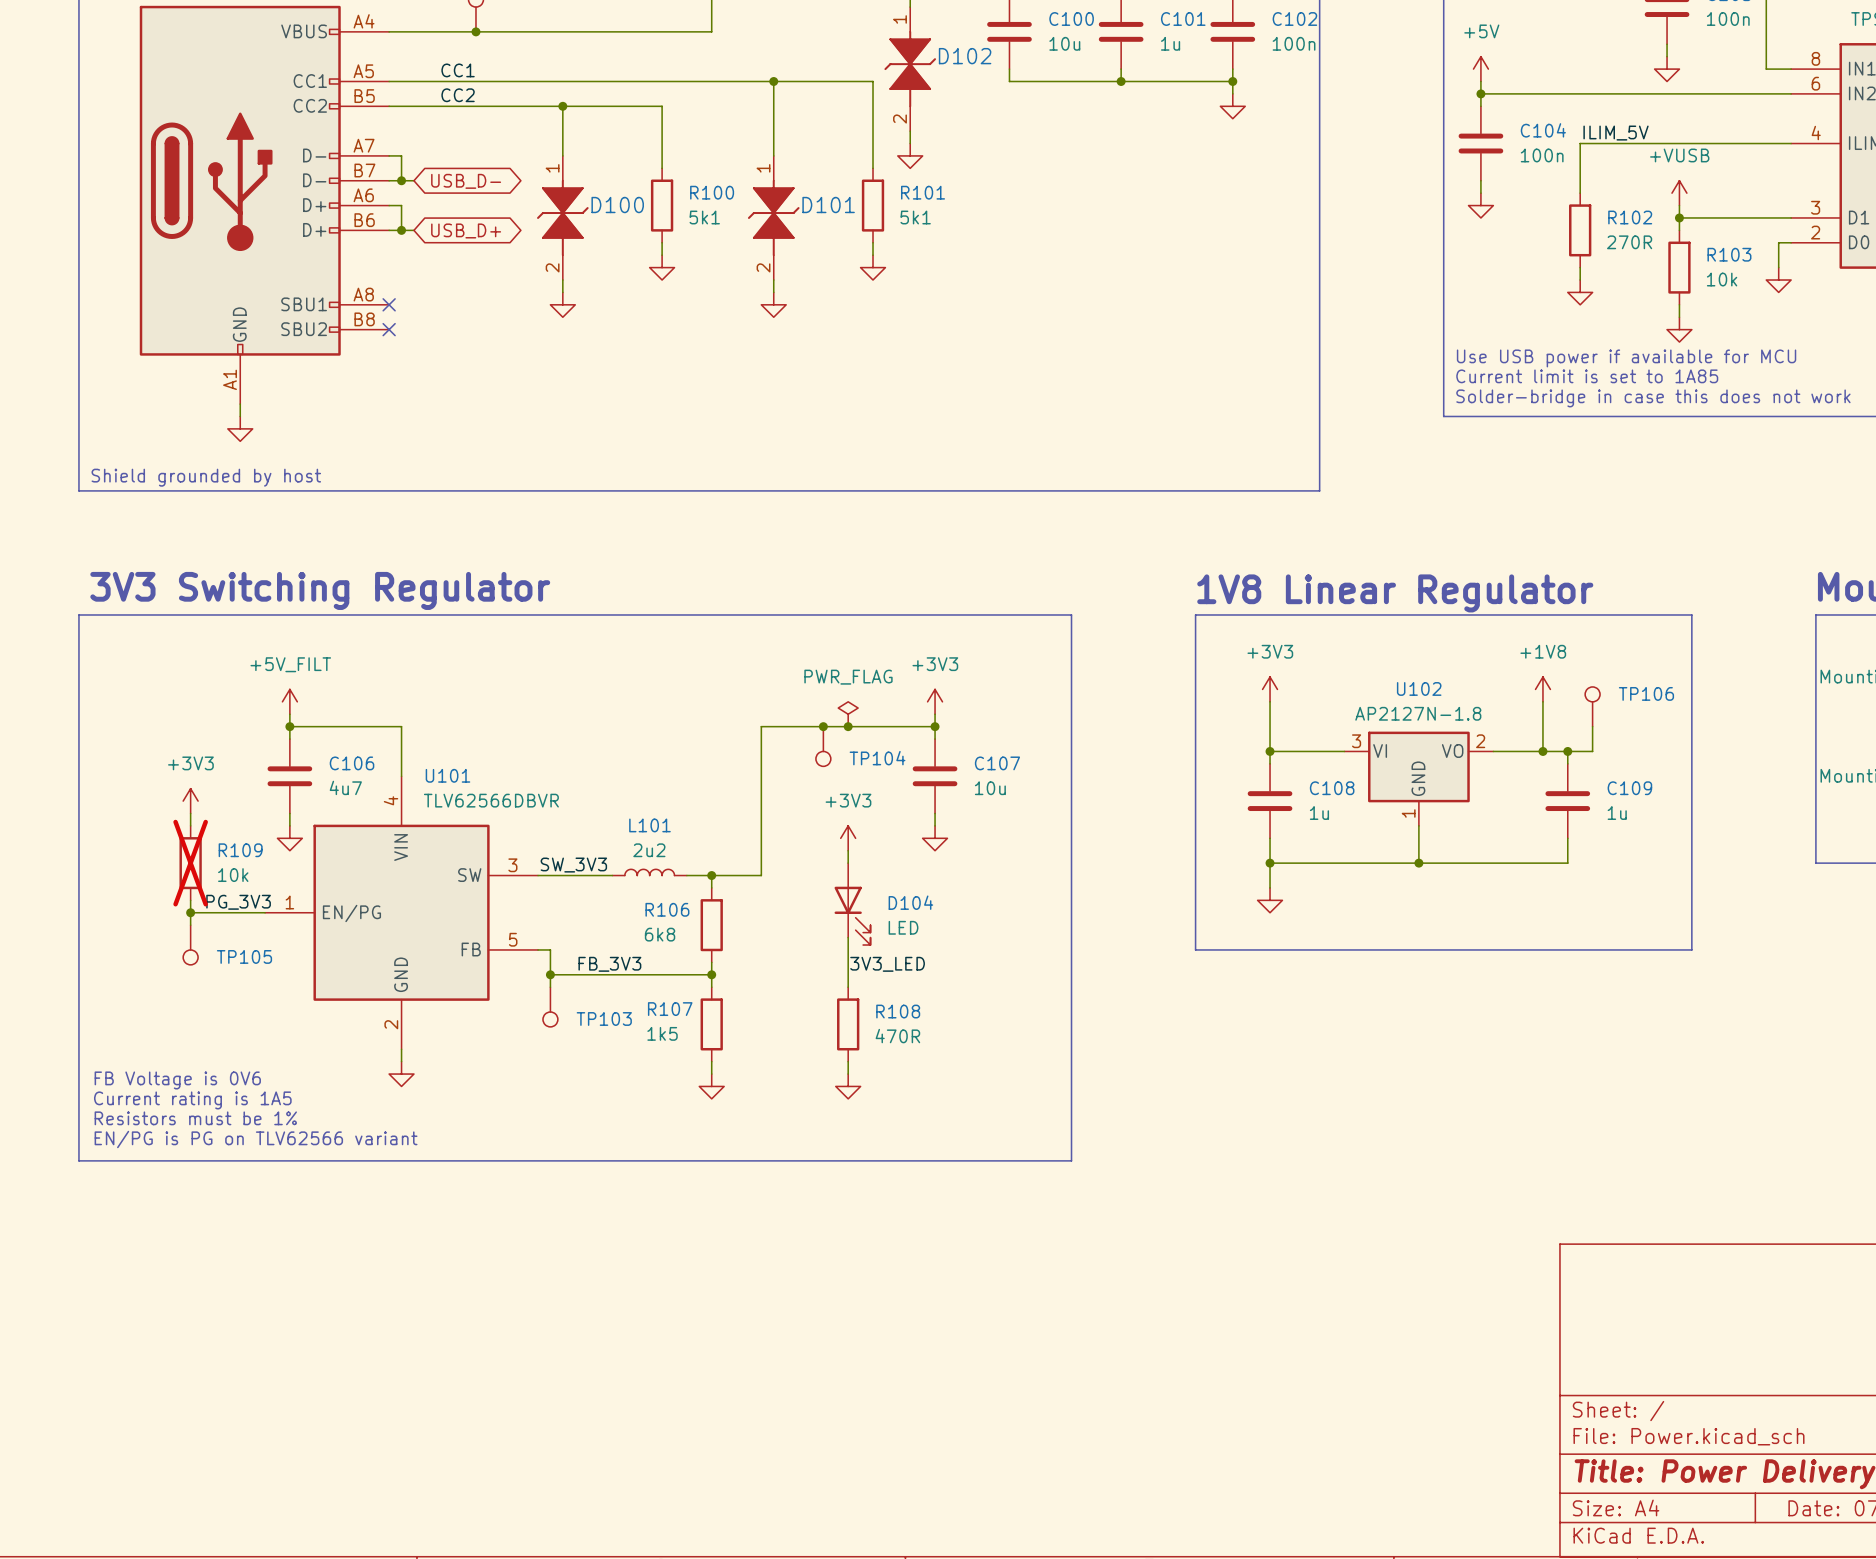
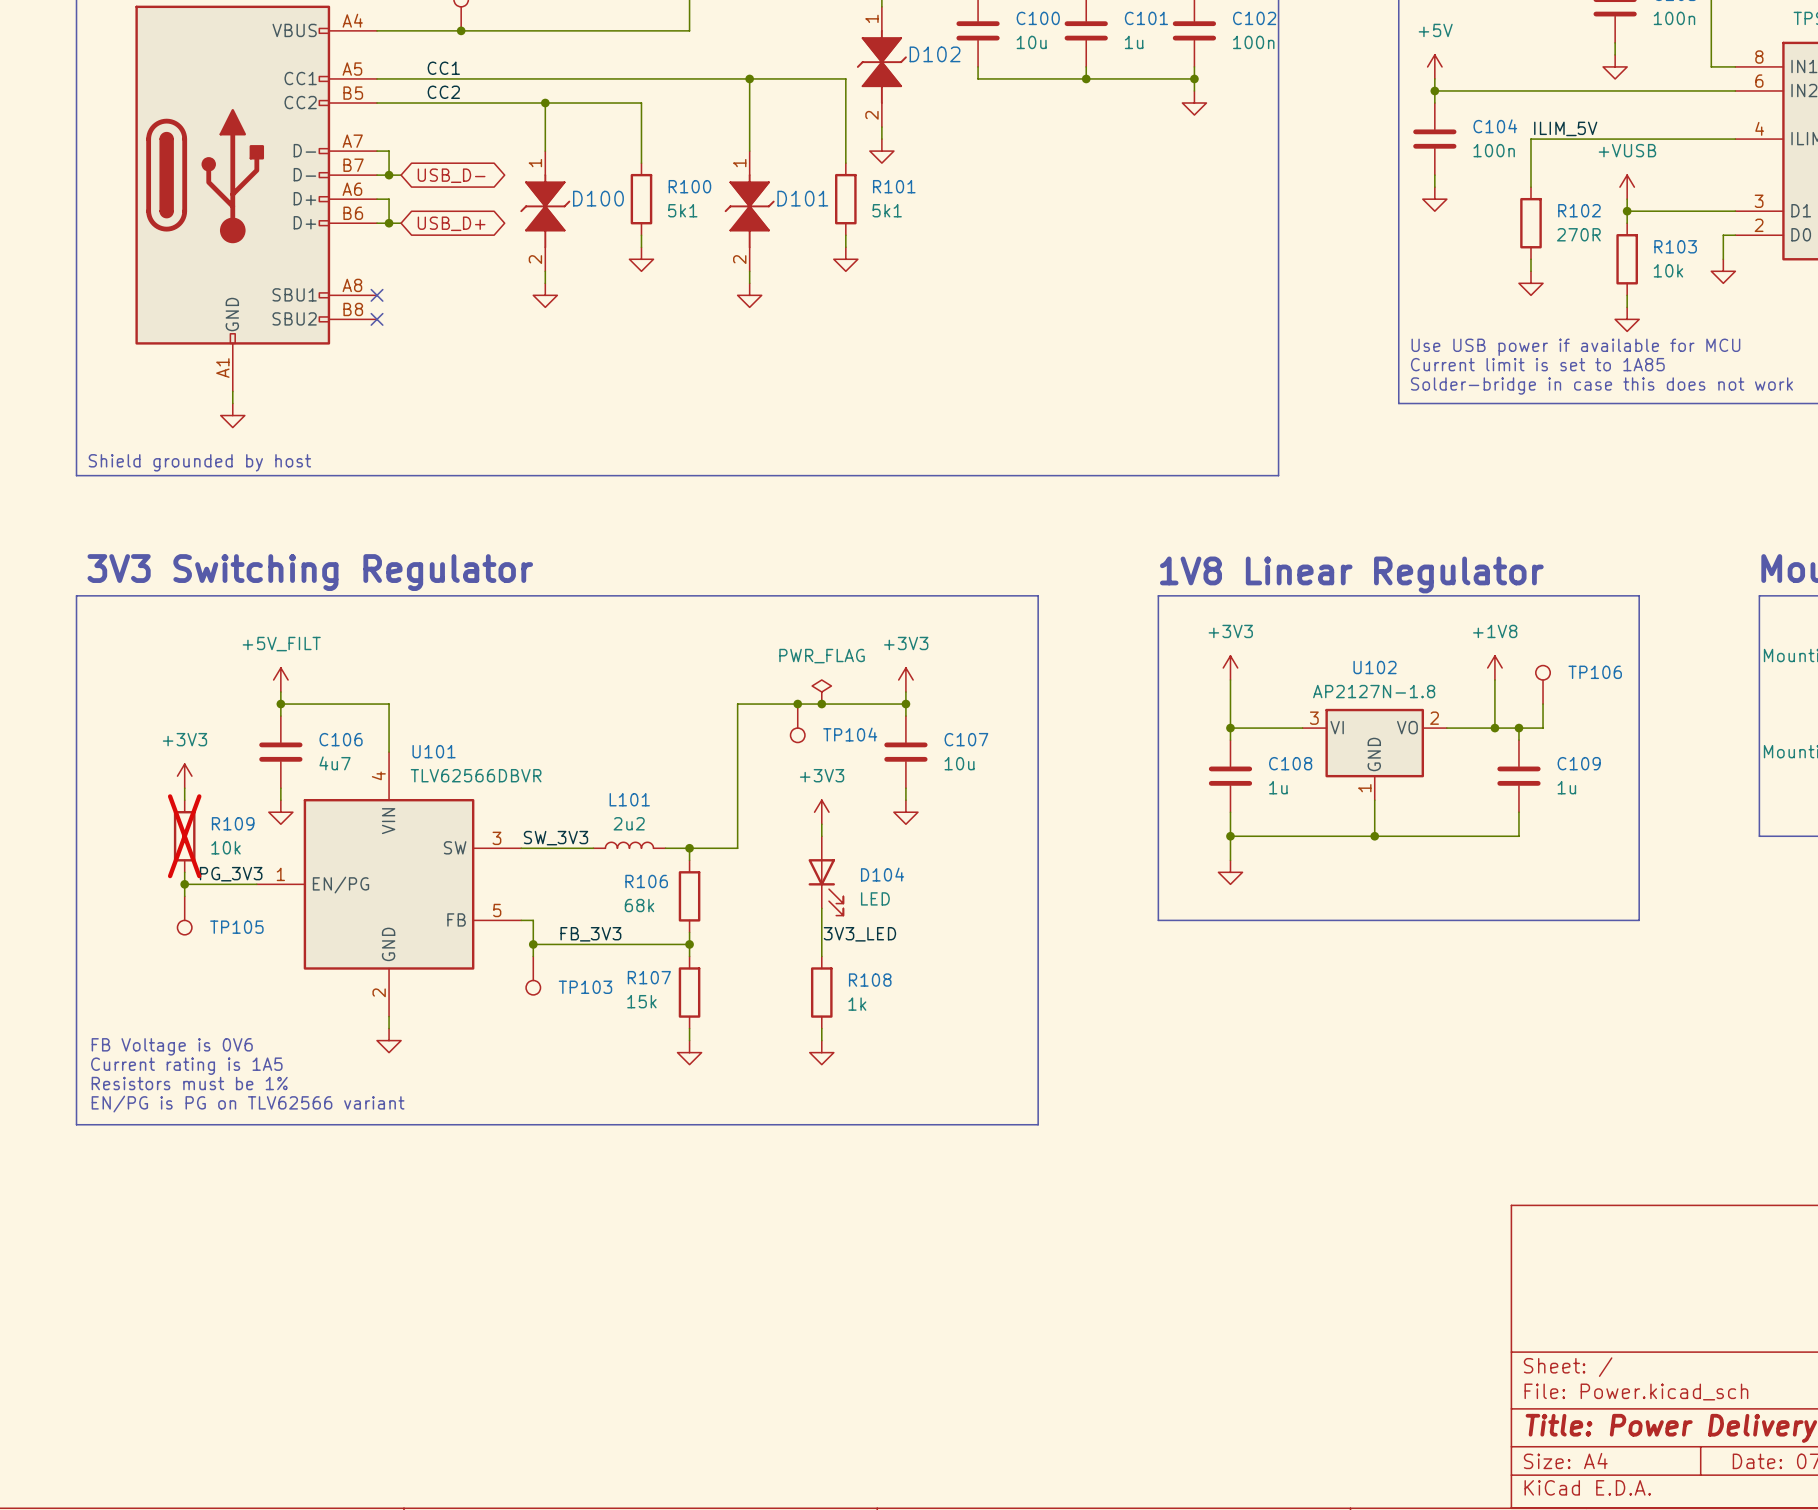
R106 value: 6k8 (660, 934) -> 68k (639, 905)
R107 value: 1k5 (662, 1033) -> 15k (641, 1001)
R108 value: 470R (897, 1036) -> 1k (857, 1004)

